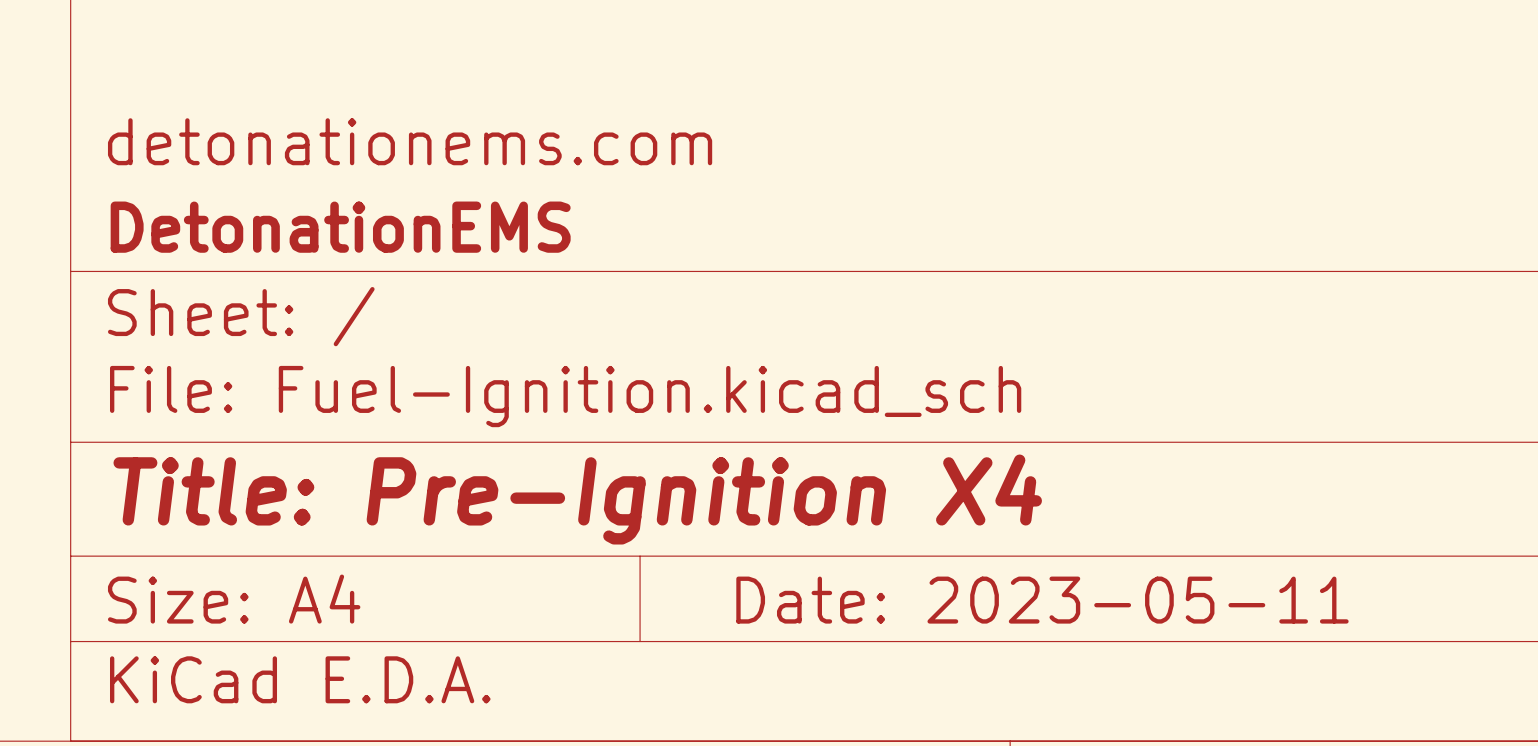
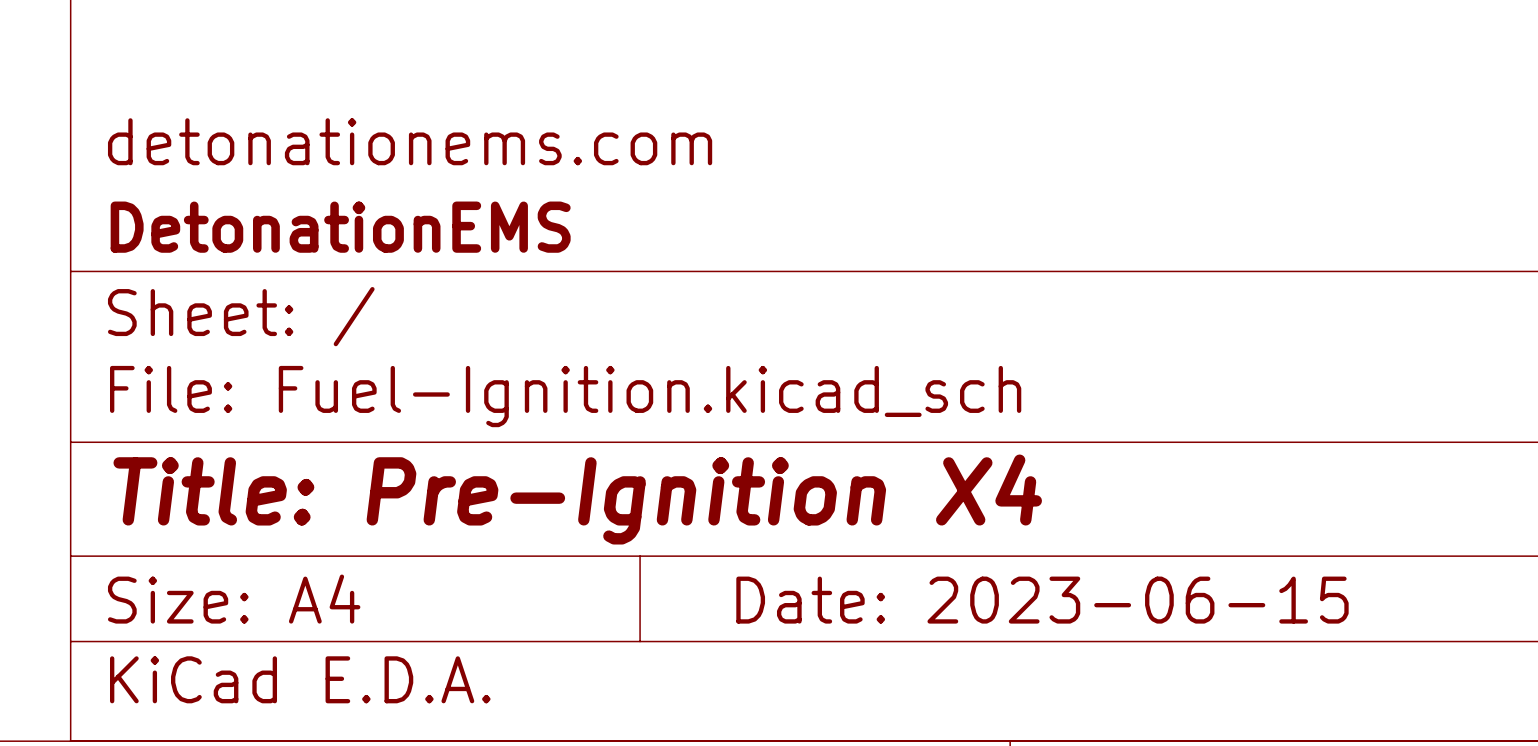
title block: Date: 2023-05-11 (1042, 600) -> Date: 2023-06-15 (1042, 600)

